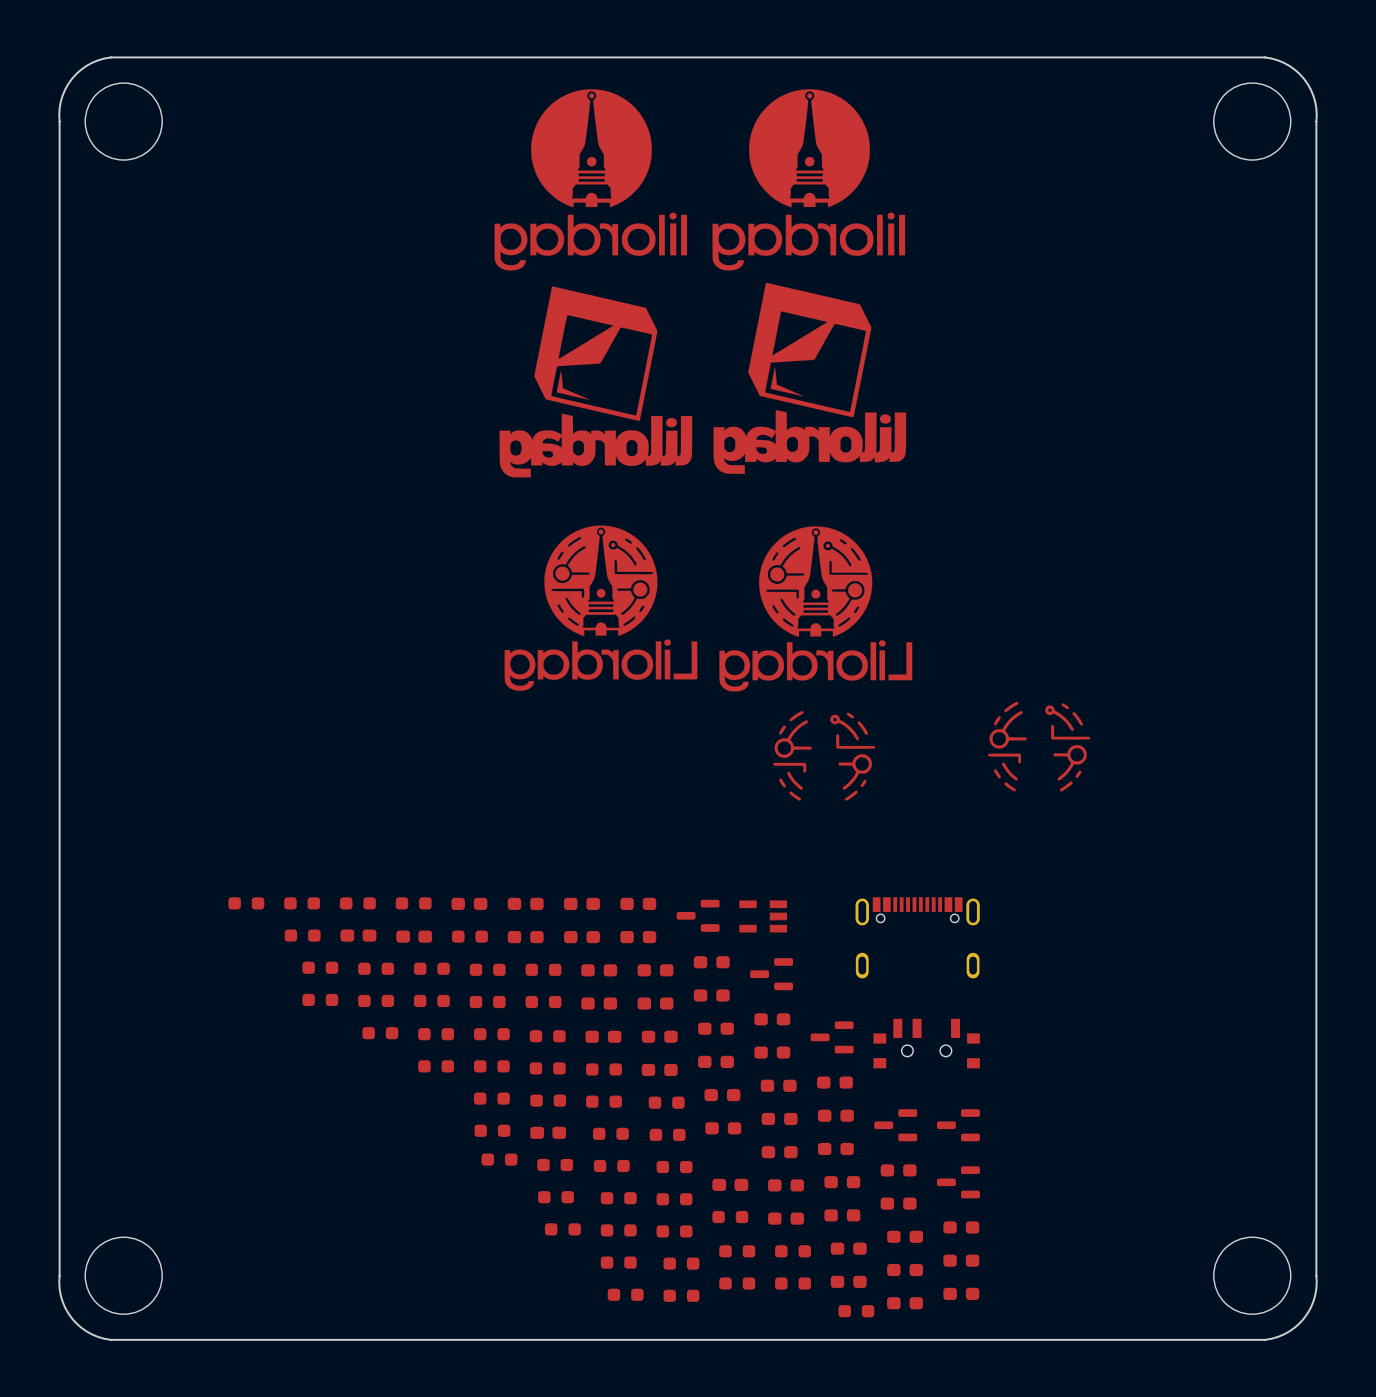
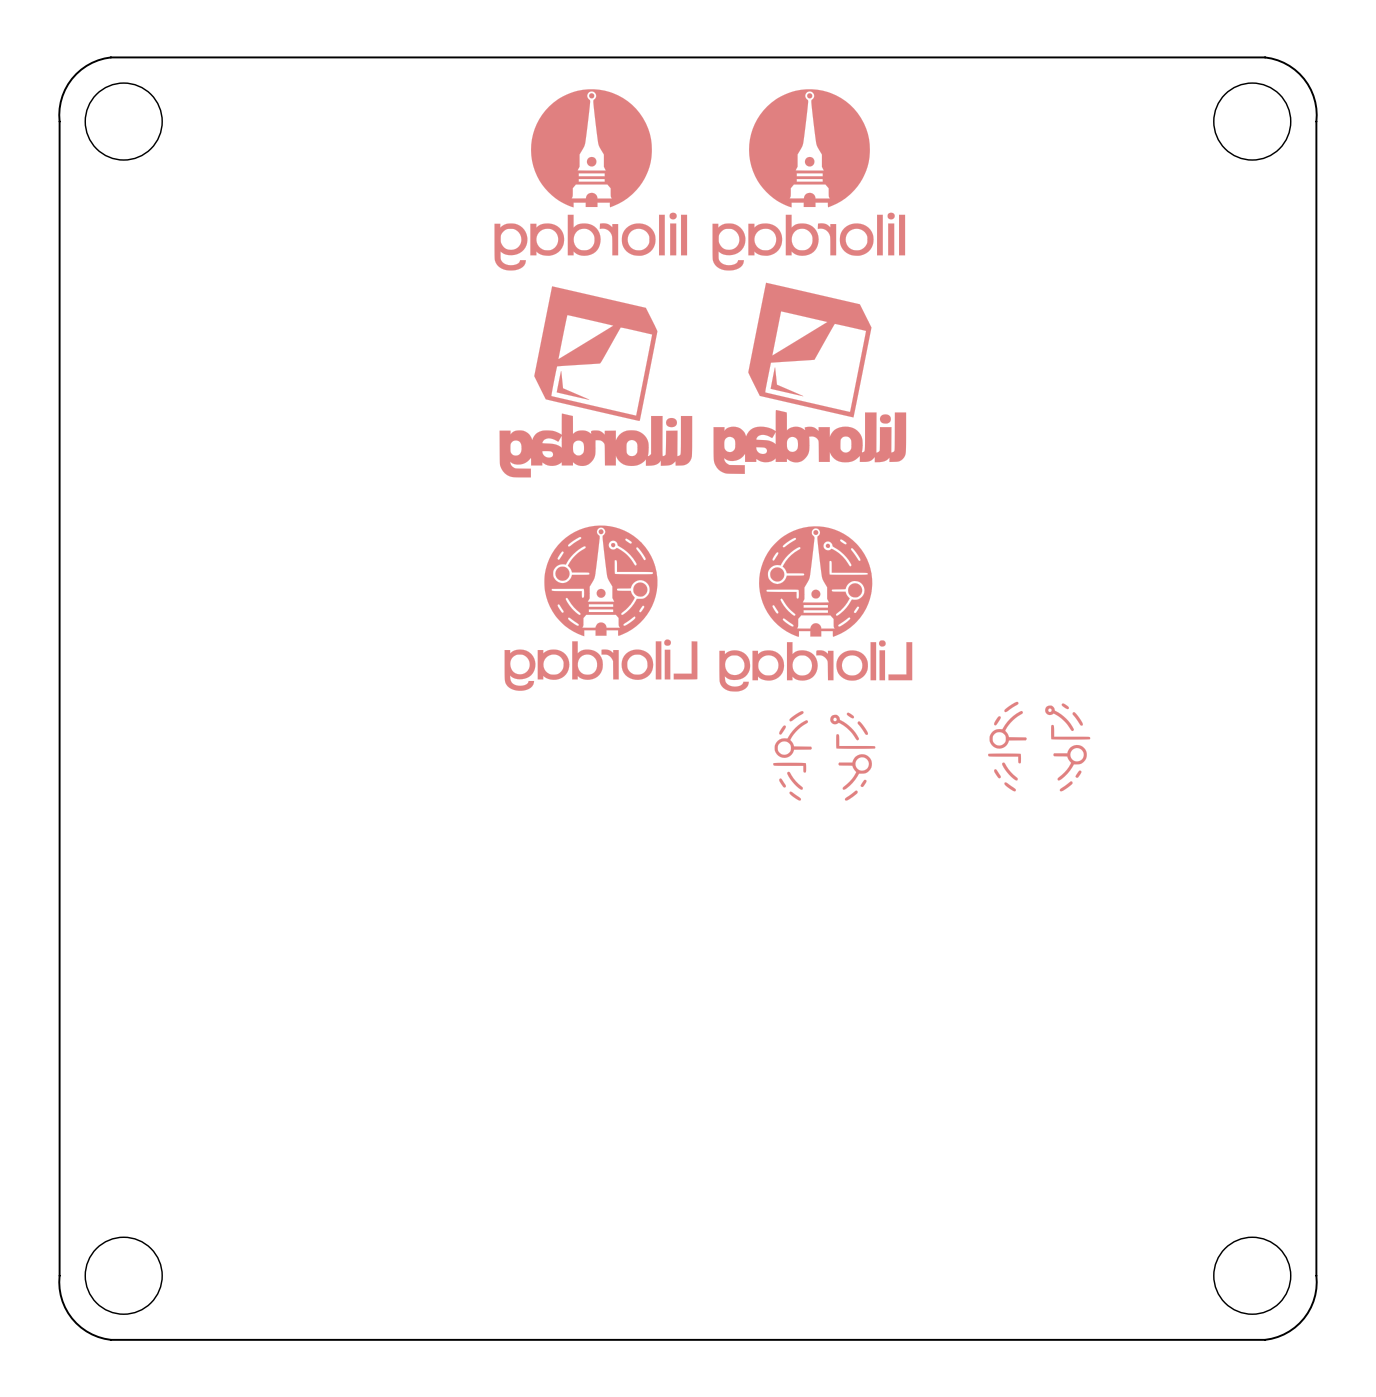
part: (246, 903) -> none
part: (302, 903) -> none
part: (357, 903) -> none
part: (413, 903) -> none
part: (469, 903) -> none
part: (525, 903) -> none
part: (582, 903) -> none
part: (638, 903) -> none
part: (698, 915) -> none
part: (763, 916) -> none
part: (302, 935) -> none
part: (358, 935) -> none
part: (414, 936) -> none
part: (469, 936) -> none
part: (525, 937) -> none
part: (582, 937) -> none
part: (638, 937) -> none
part: (917, 937) -> none
part: (711, 962) -> none
part: (320, 967) -> none
part: (376, 968) -> none
part: (431, 968) -> none
part: (487, 969) -> none
part: (543, 969) -> none
part: (599, 970) -> none
part: (655, 970) -> none
part: (771, 974) -> none
part: (711, 995) -> none
part: (320, 999) -> none
part: (376, 1000) -> none
part: (431, 1000) -> none
part: (487, 1002) -> none
part: (543, 1002) -> none
part: (599, 1003) -> none
part: (655, 1003) -> none
part: (772, 1019) -> none
part: (716, 1028) -> none
part: (380, 1033) -> none
part: (436, 1034) -> none
part: (491, 1034) -> none
part: (547, 1036) -> none
part: (603, 1036) -> none
part: (659, 1036) -> none
part: (832, 1037) -> none
part: (926, 1043) -> none
part: (772, 1052) -> none
part: (716, 1061) -> none
part: (436, 1066) -> none
part: (491, 1066) -> none
part: (547, 1068) -> none
part: (603, 1069) -> none
part: (659, 1069) -> none
part: (835, 1082) -> none
part: (778, 1085) -> none
part: (722, 1095) -> none
part: (491, 1098) -> none
part: (548, 1100) -> none
part: (603, 1101) -> none
part: (666, 1102) -> none
part: (835, 1115) -> none
part: (779, 1118) -> none
part: (895, 1125) -> none
part: (958, 1125) -> none
part: (723, 1128) -> none
part: (492, 1130) -> none
part: (548, 1132) -> none
part: (610, 1133) -> none
part: (667, 1134) -> none
part: (835, 1148) -> none
part: (779, 1152) -> none
part: (499, 1159) -> none
part: (555, 1165) -> none
part: (611, 1166) -> none
part: (674, 1167) -> none
part: (898, 1170) -> none
part: (842, 1182) -> none
part: (958, 1182) -> none
part: (730, 1184) -> none
part: (786, 1185) -> none
part: (556, 1197) -> none
part: (618, 1198) -> none
part: (674, 1199) -> none
part: (898, 1203) -> none
part: (842, 1215) -> none
part: (730, 1217) -> none
part: (786, 1218) -> none
part: (961, 1227) -> none
part: (562, 1229) -> none
part: (618, 1230) -> none
part: (674, 1231) -> none
part: (905, 1236) -> none
part: (848, 1248) -> none
part: (737, 1251) -> none
part: (793, 1251) -> none
part: (961, 1260) -> none
part: (618, 1262) -> none
part: (681, 1263) -> none
part: (905, 1270) -> none
part: (848, 1281) -> none
part: (737, 1283) -> none
part: (793, 1283) -> none
part: (961, 1293) -> none
part: (625, 1294) -> none
part: (681, 1295) -> none
part: (905, 1303) -> none
part: (856, 1311) -> none

